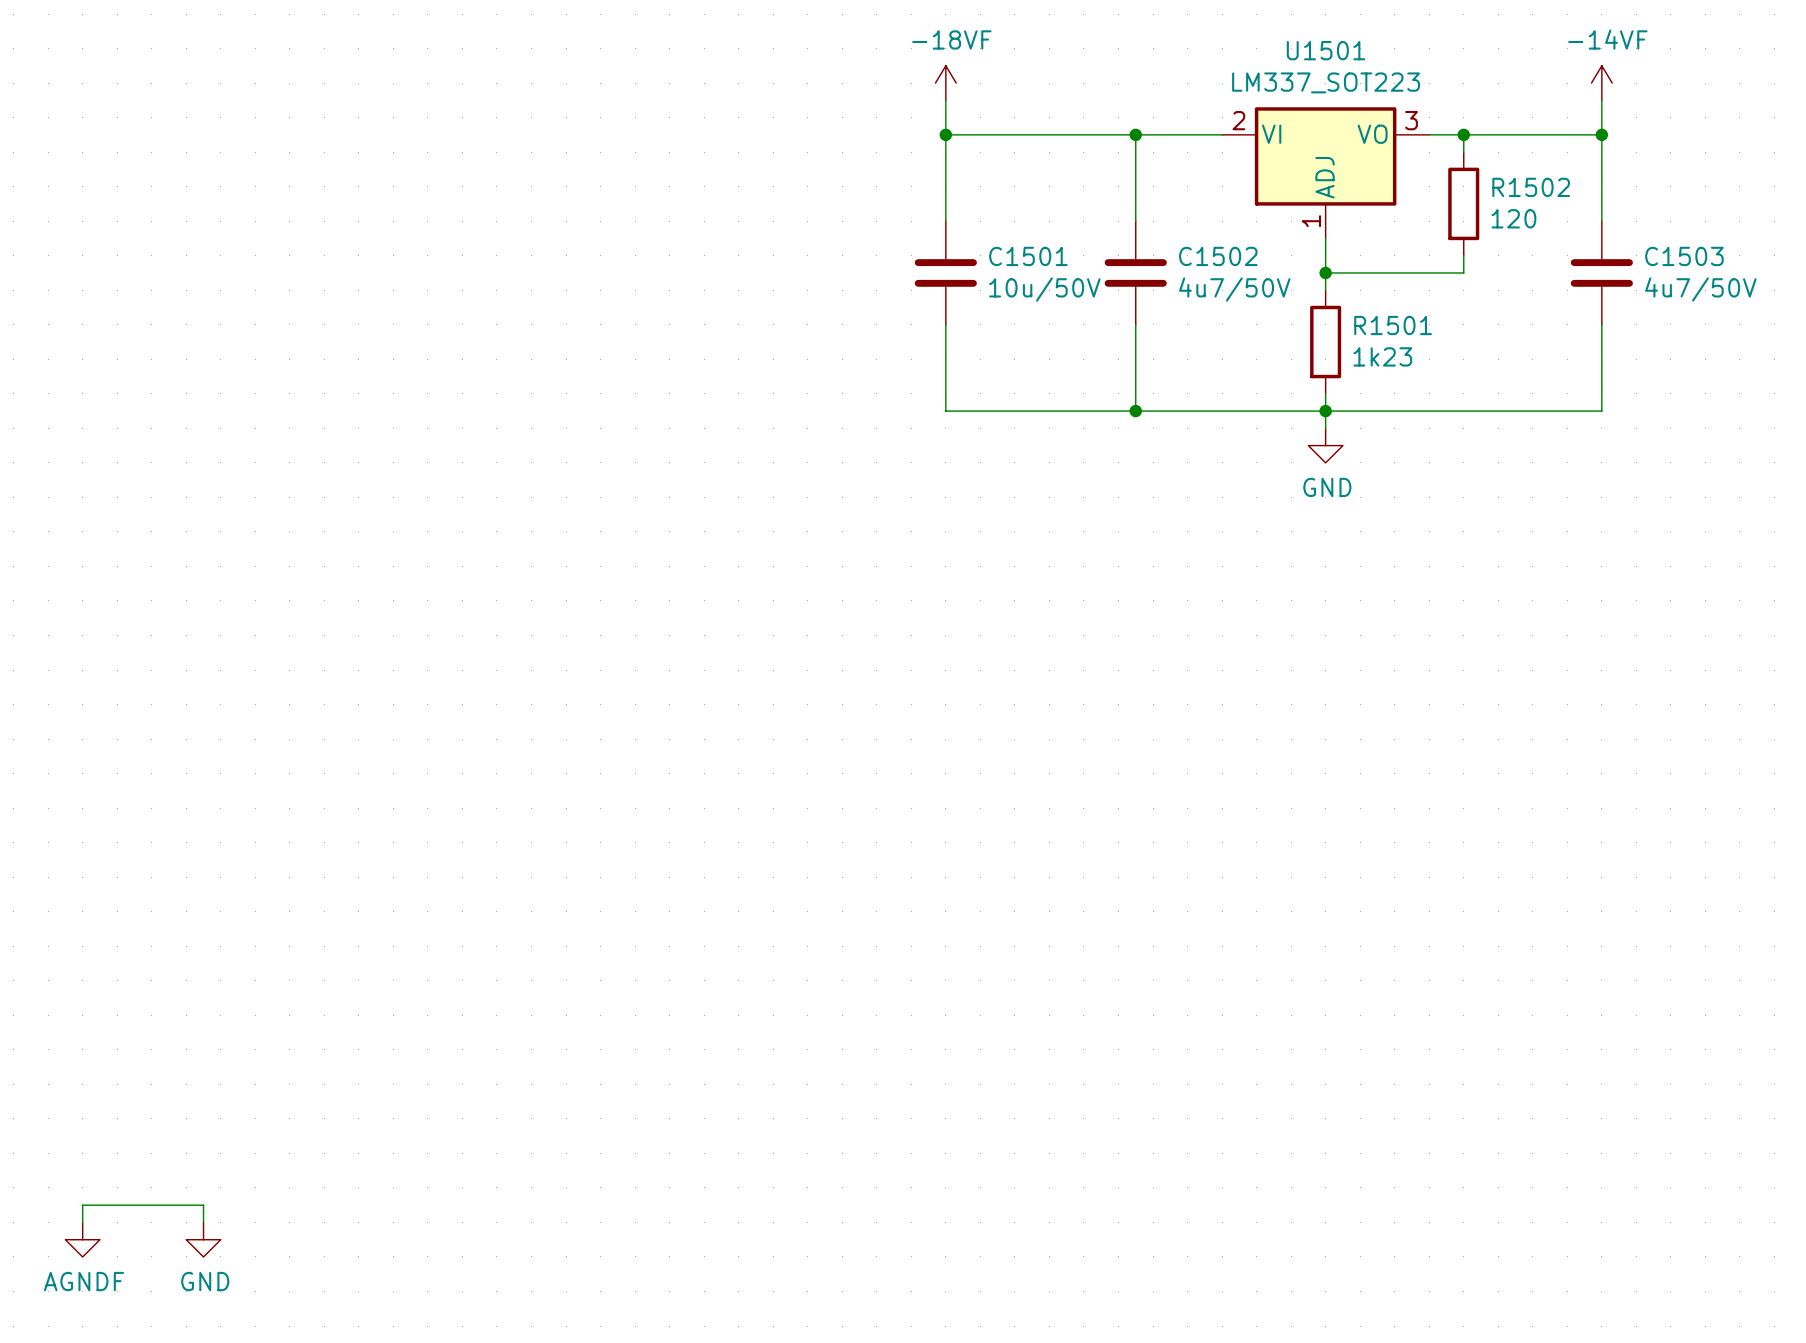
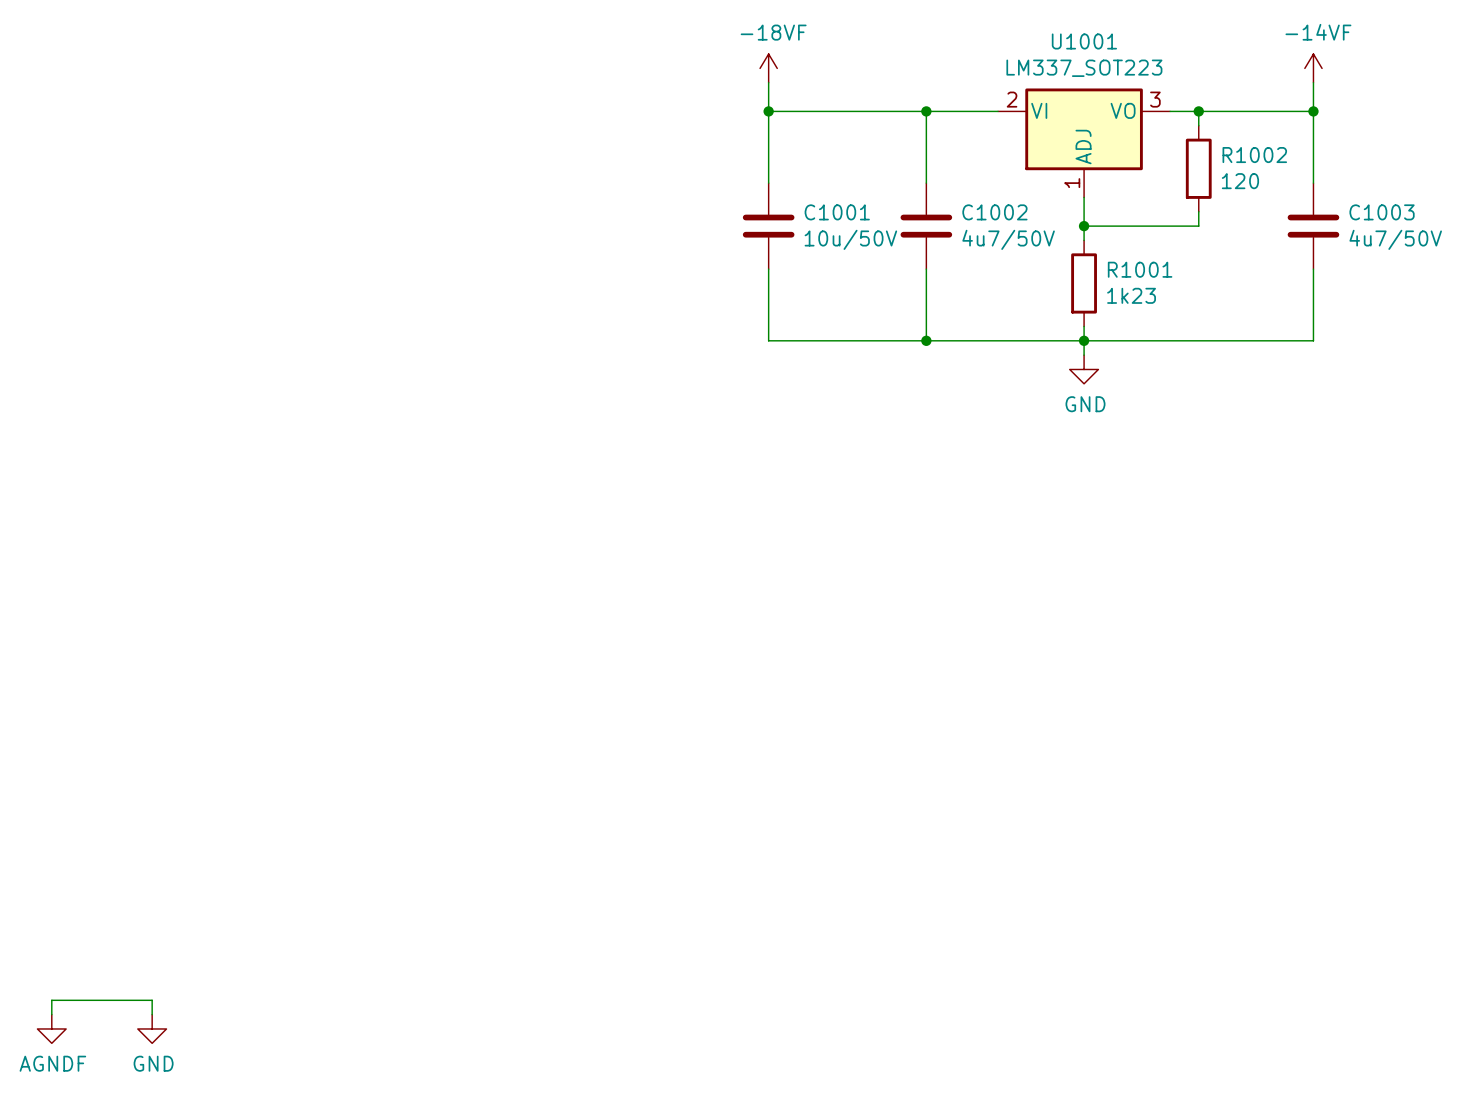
U1501 name: U1501 (1326, 50) -> U1001 (1084, 41)
R1502 name: R1502 (1531, 187) -> R1002 (1254, 155)
C1501 name: C1501 (1028, 256) -> C1001 (837, 212)
C1502 name: C1502 (1218, 256) -> C1002 (994, 212)
C1503 name: C1503 (1684, 256) -> C1003 (1382, 212)
R1501 name: R1501 (1393, 325) -> R1001 (1140, 269)

